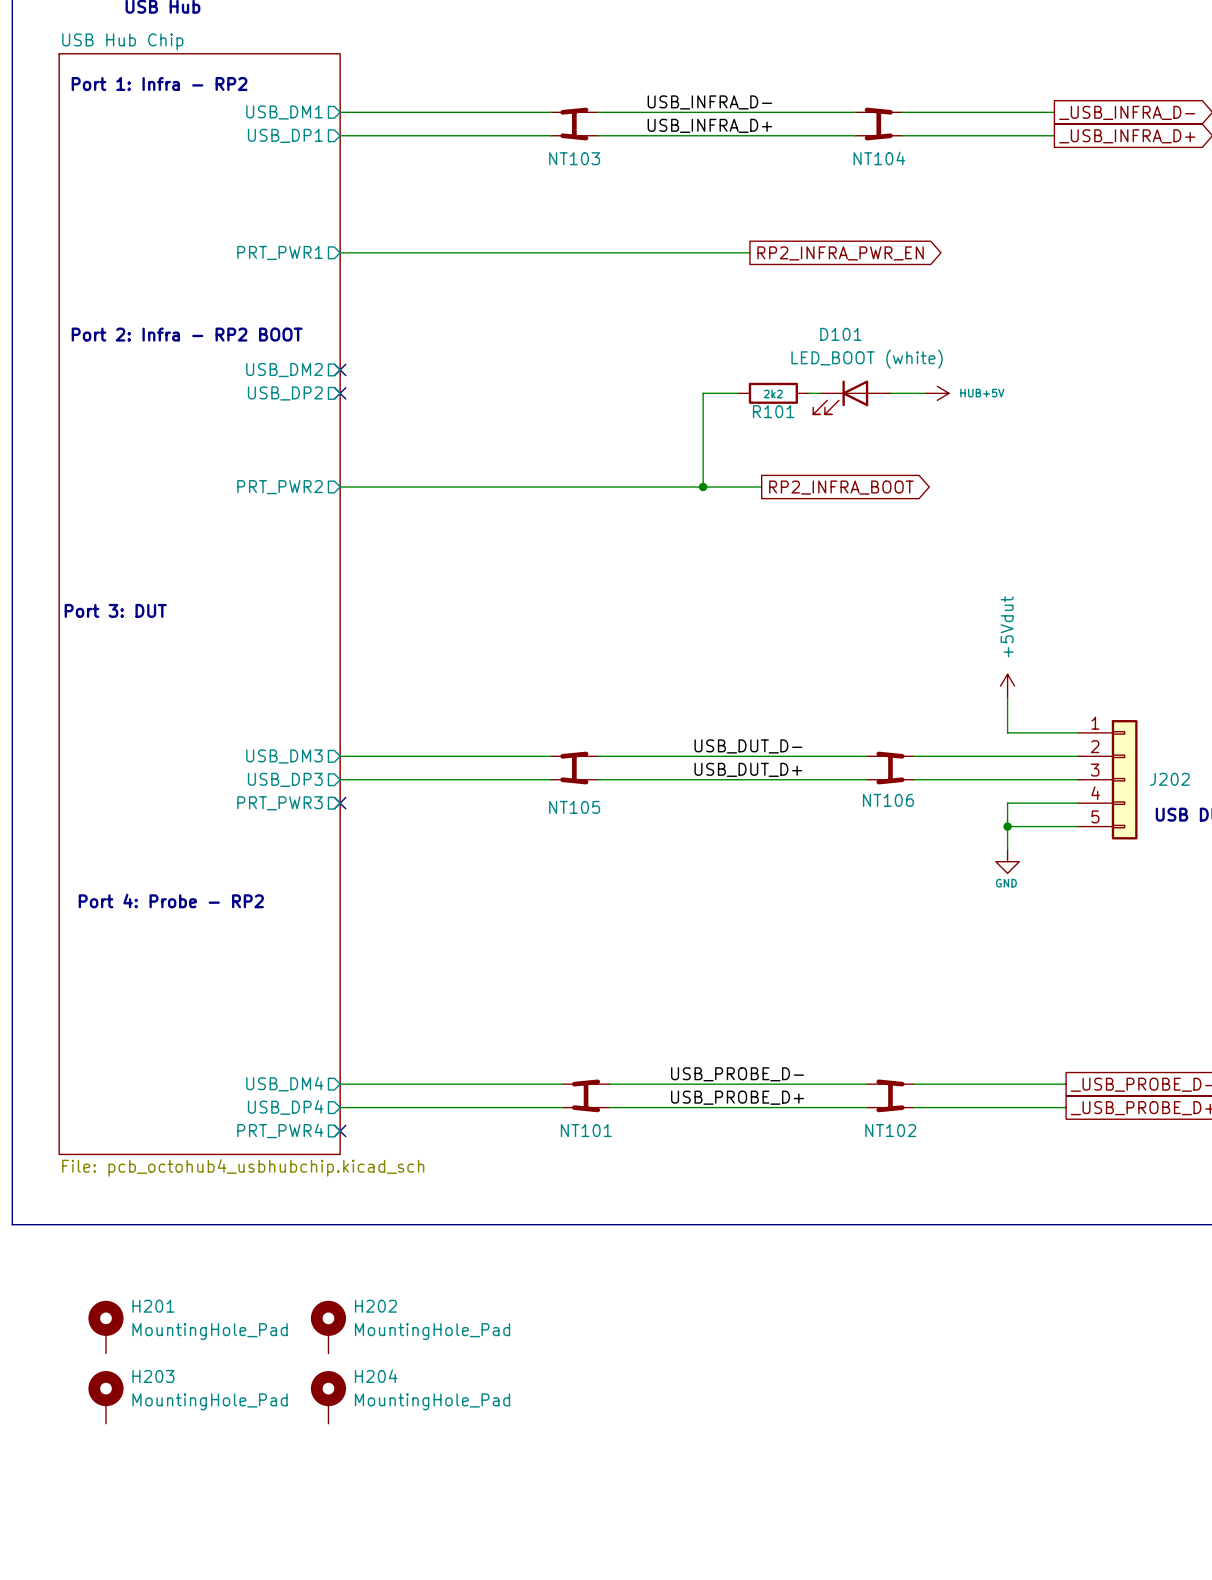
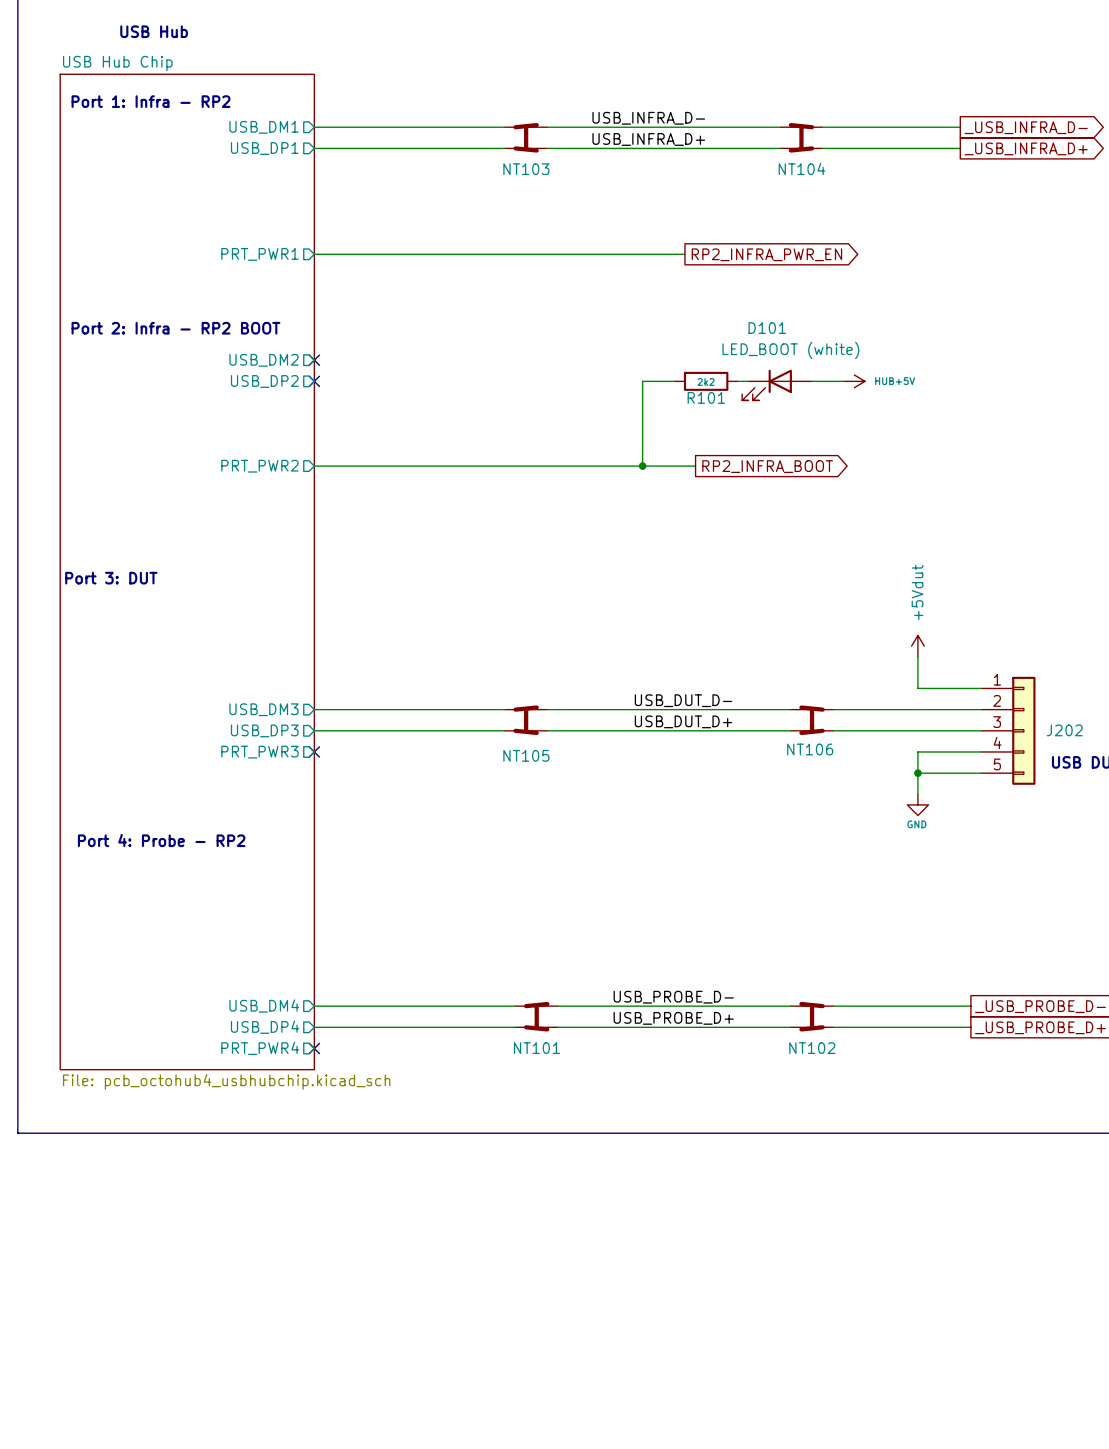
H201: MountingHole_Pad (105, 1327) -> none
H202: MountingHole_Pad (328, 1327) -> none
H203: MountingHole_Pad (105, 1397) -> none
H204: MountingHole_Pad (328, 1397) -> none

